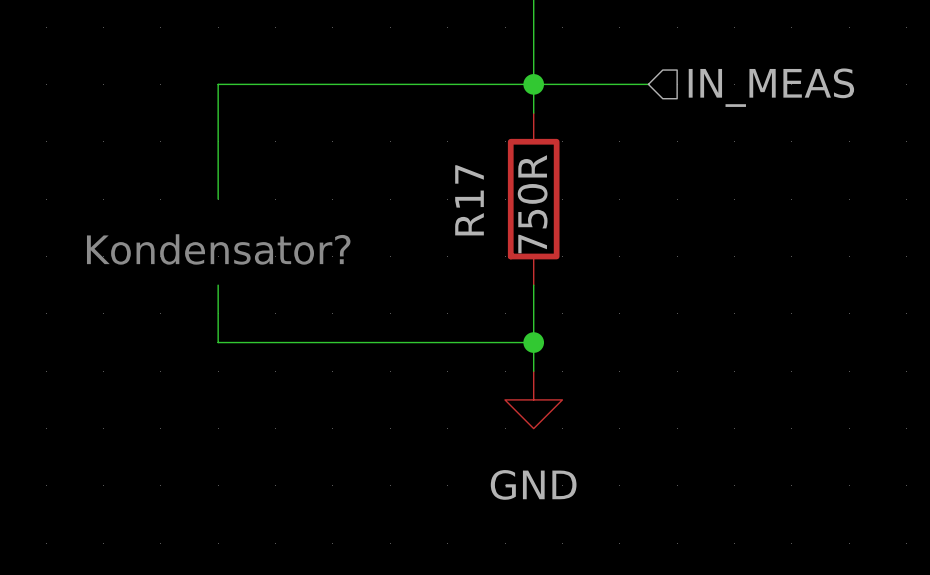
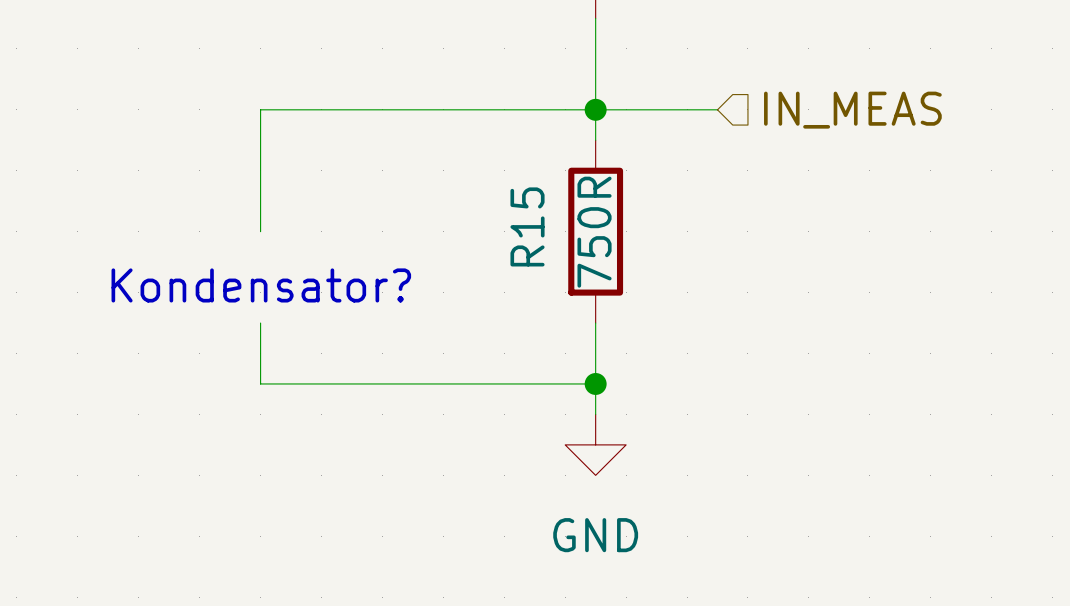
R17 name: R17 (469, 200) -> R15 (527, 226)

